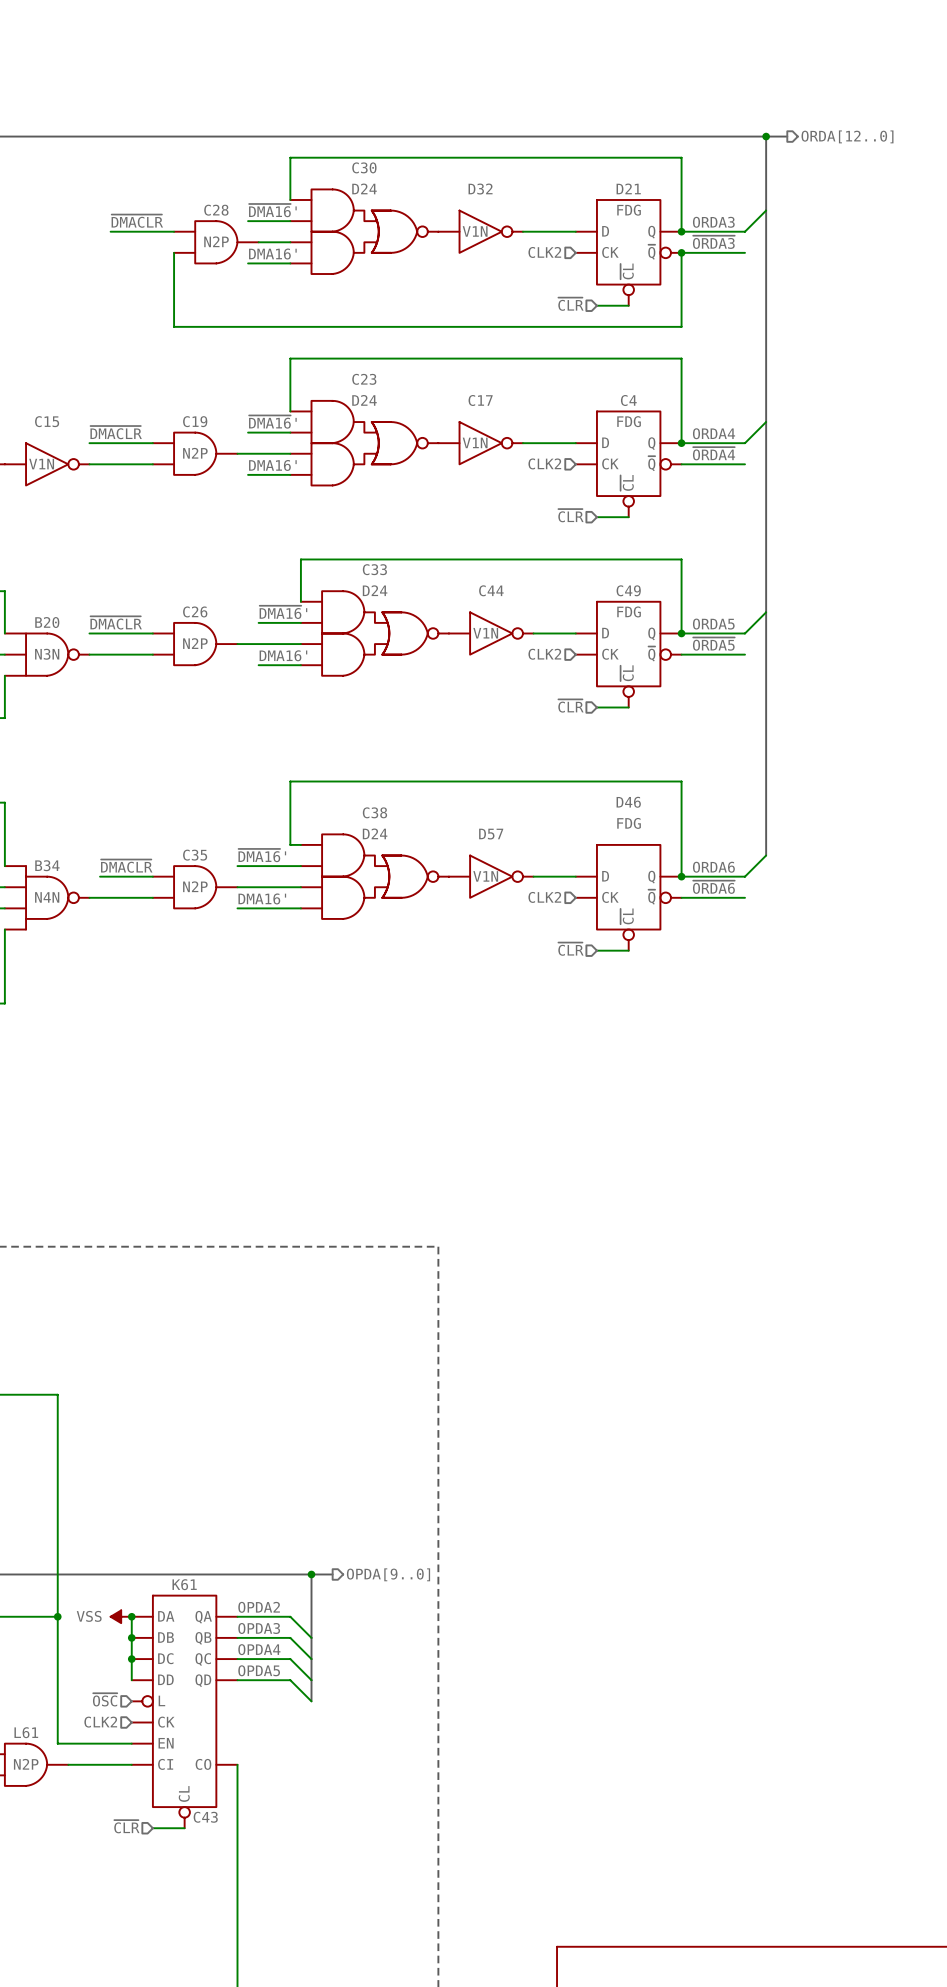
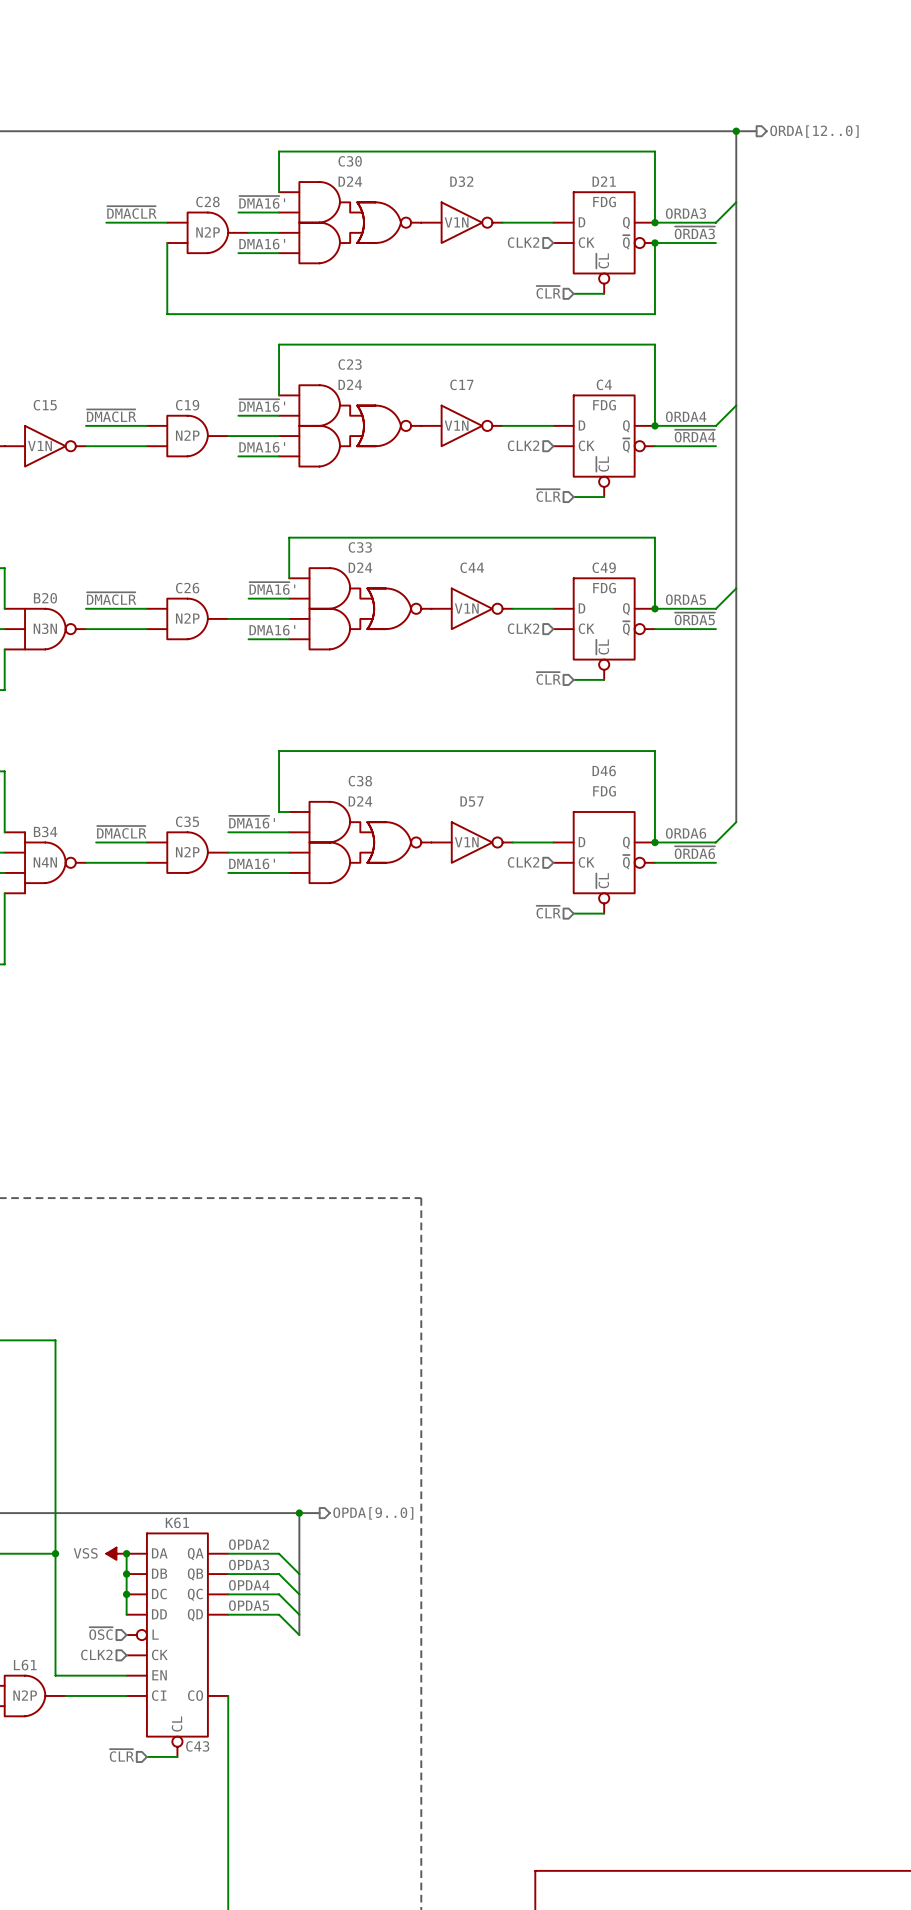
label position: ~{ORDA3} (713, 242) -> ~{ORDA3} (694, 232)
label position: ~{ORDA4} (714, 453) -> ~{ORDA4} (695, 436)
label position: ~{ORDA5} (713, 644) -> ~{ORDA5} (694, 618)
label position: ~{ORDA6} (713, 887) -> ~{ORDA6} (694, 852)

